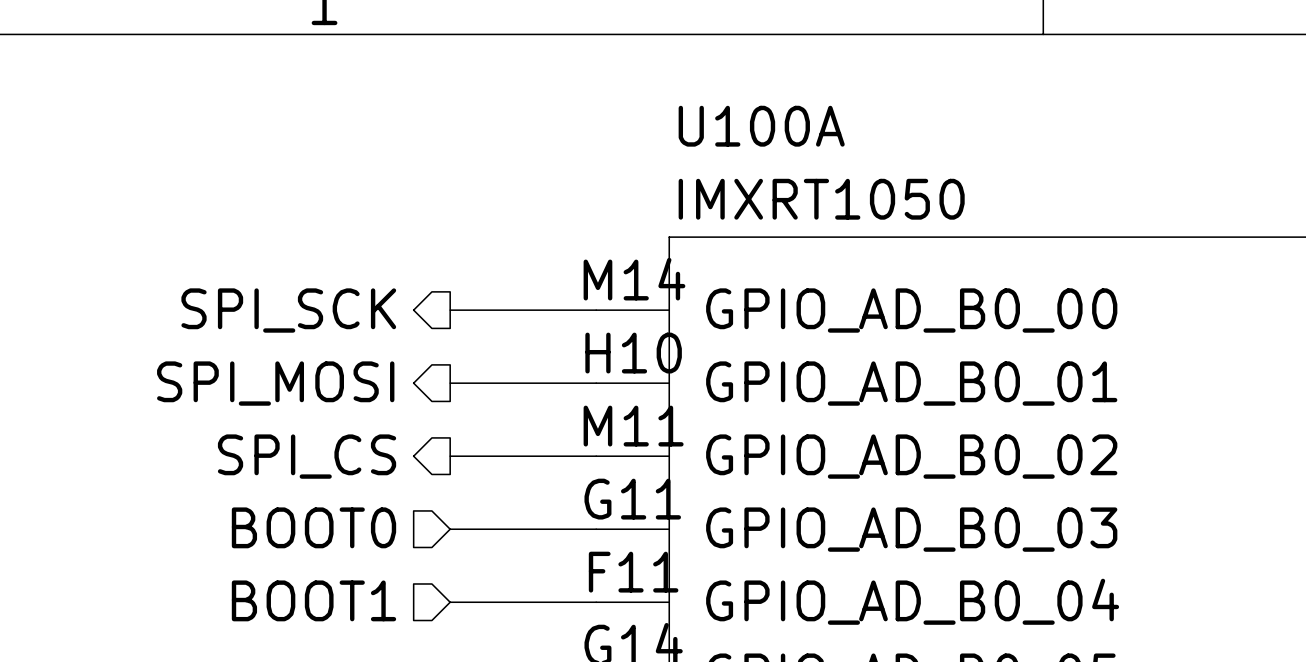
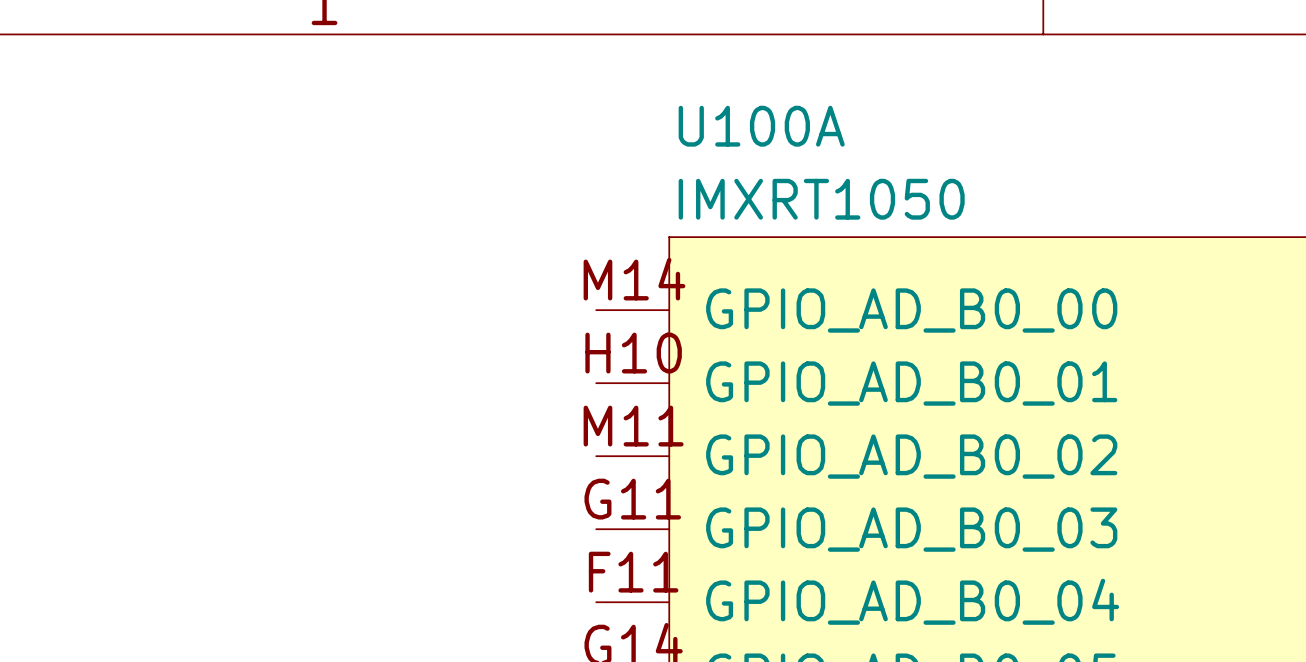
hierarchical label: SPI_SCK (288, 310) -> none
wire: (450, 310) (596, 310) -> none
hierarchical label: SPI_MOSI (275, 383) -> none
wire: (450, 383) (596, 383) -> none
hierarchical label: SPI_CS (307, 456) -> none
wire: (450, 456) (596, 456) -> none
hierarchical label: BOOT0 (313, 527) -> none
wire: (450, 529) (596, 529) -> none
hierarchical label: BOOT1 (313, 600) -> none
wire: (450, 602) (596, 602) -> none

